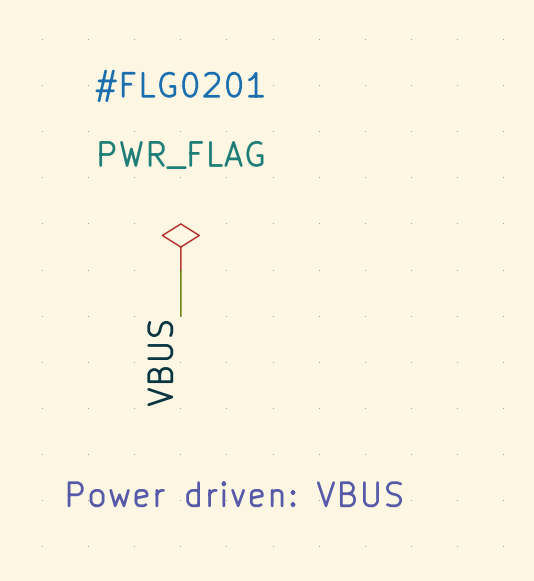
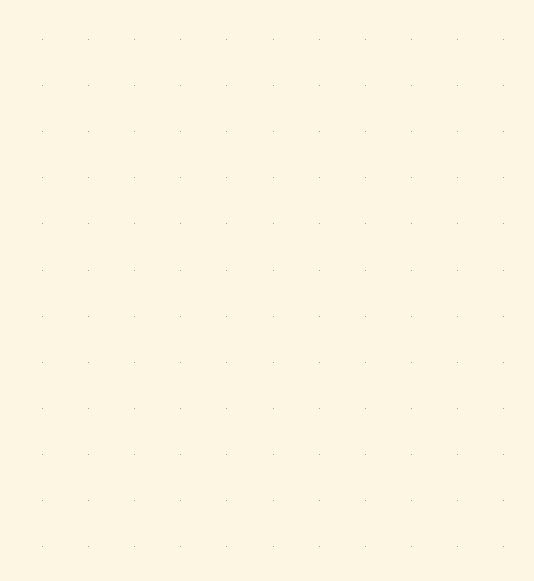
#FLG0201: PWR_FLAG (180, 247) -> none
wire: (180, 270) (180, 316) -> none
label: VBUS (160, 363) -> none
text: Power driven: VBUS (234, 494) -> none

